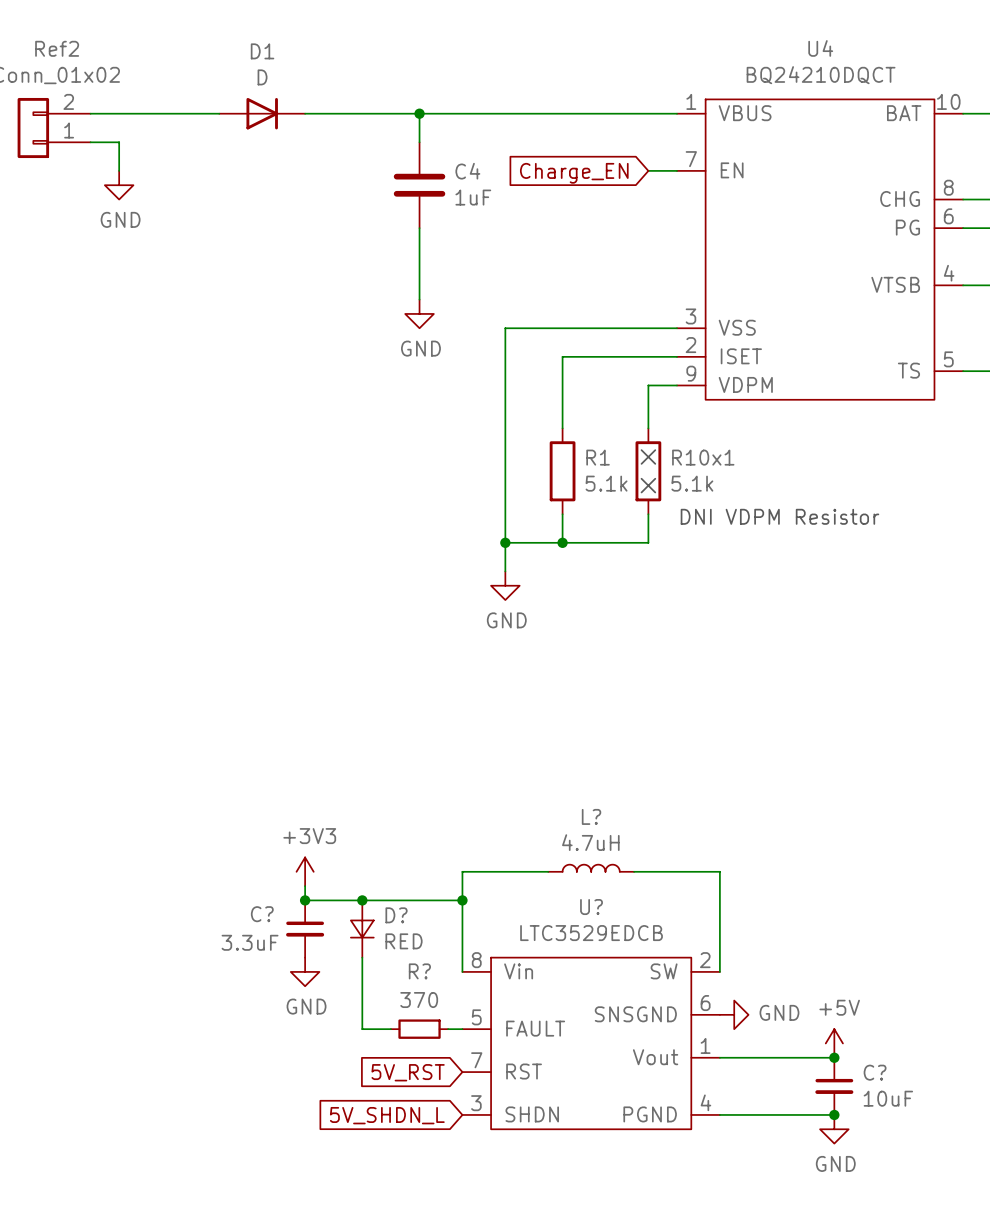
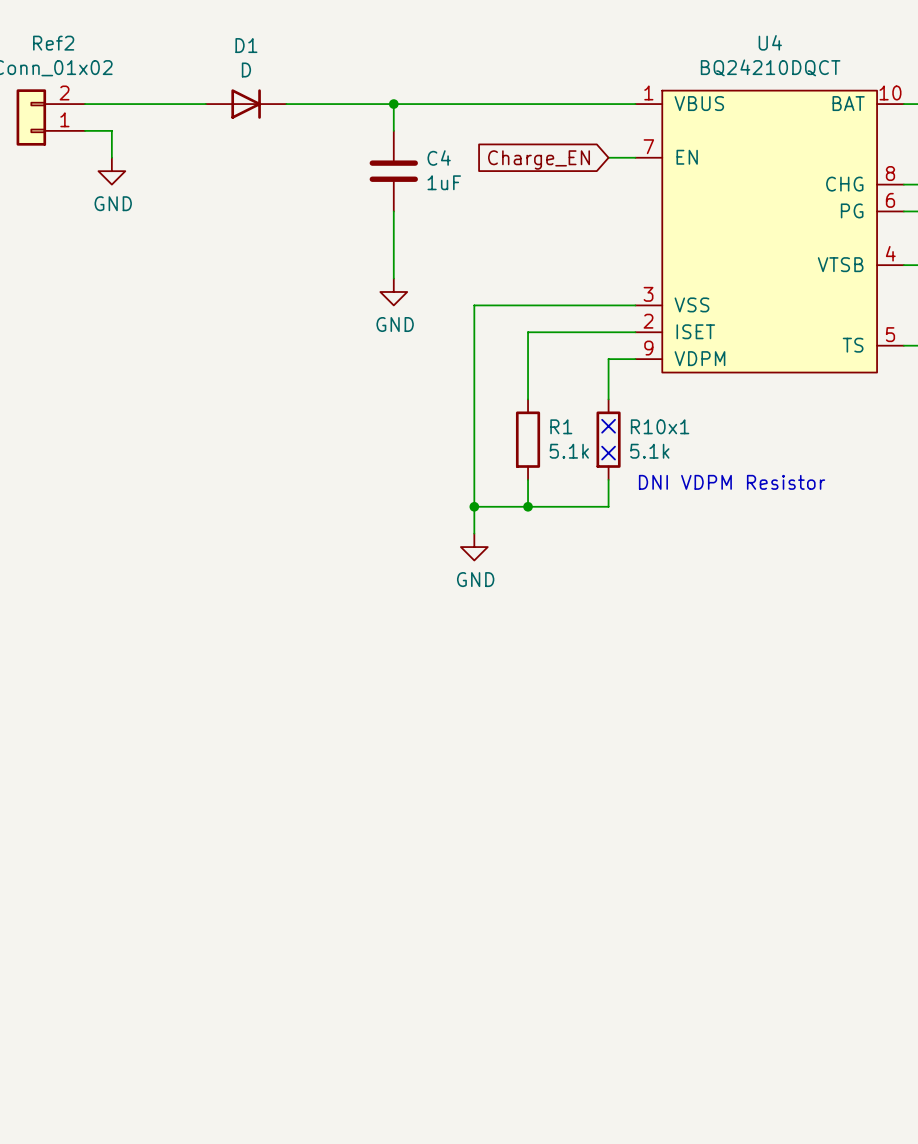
L?: 4.7uH (591, 868) -> none
power symbol: +3V3 (305, 871) -> none
wire: (548, 871) (462, 871) (462, 971) -> none
wire: (634, 871) (719, 871) (719, 971) -> none
wire: (305, 886) (305, 900) (462, 900) -> none
junction: (305, 900) -> none
junction: (362, 900) -> none
junction: (462, 900) -> none
C?: 3.3uF (305, 929) -> none
D?: RED (362, 929) -> none
wire: (362, 957) (362, 1029) (390, 1029) -> none
power symbol: GND (305, 971) -> none
power symbol: GND (734, 1014) -> none
R?: 370 (419, 1029) -> none
wire: (448, 1029) (462, 1029) -> none
U?: LTC3529EDCB (591, 1043) -> none
power symbol: +5V (834, 1043) -> none
wire: (719, 1057) (834, 1057) -> none
junction: (834, 1057) -> none
global label: 5V_RST (408, 1072) -> none
C?: 10uF (834, 1086) -> none
wire: (719, 1114) (834, 1114) -> none
junction: (834, 1114) -> none
global label: 5V_SHDN_L (387, 1115) -> none
power symbol: GND (834, 1129) -> none

